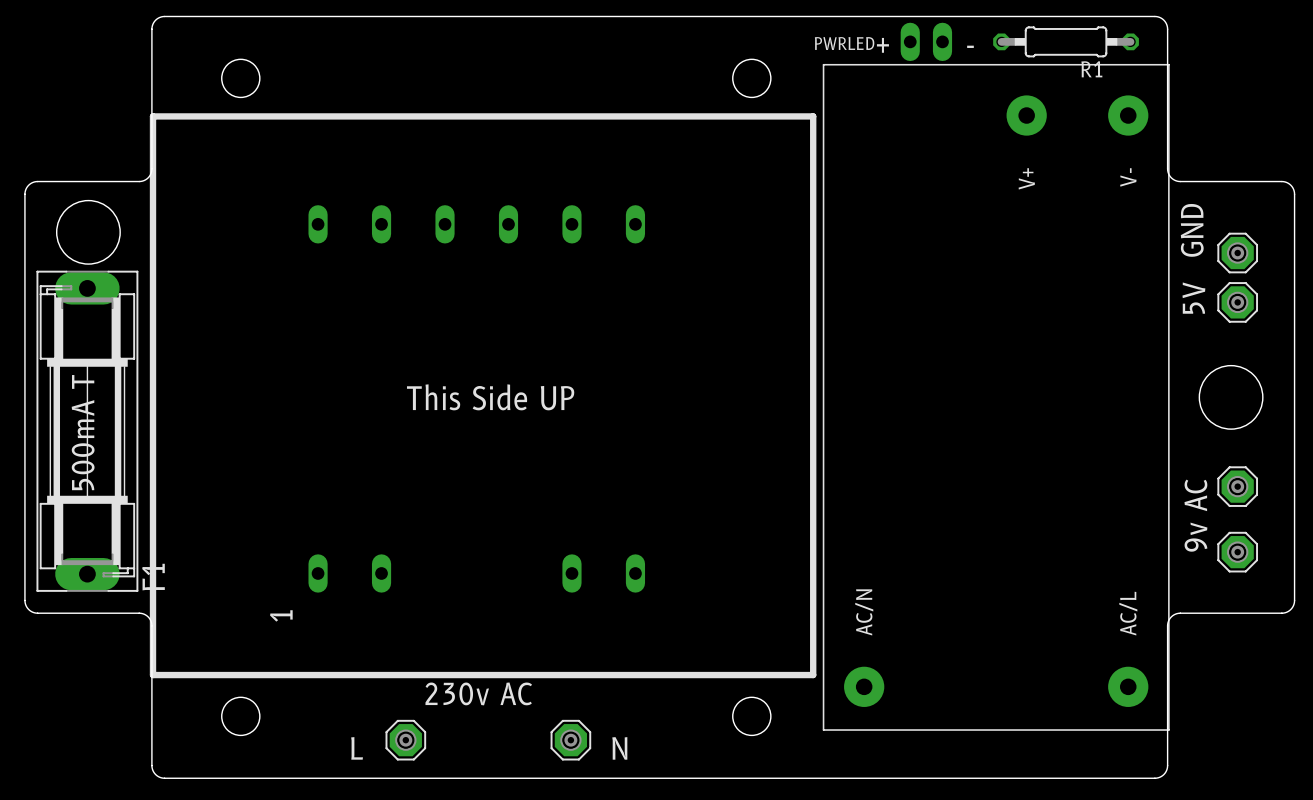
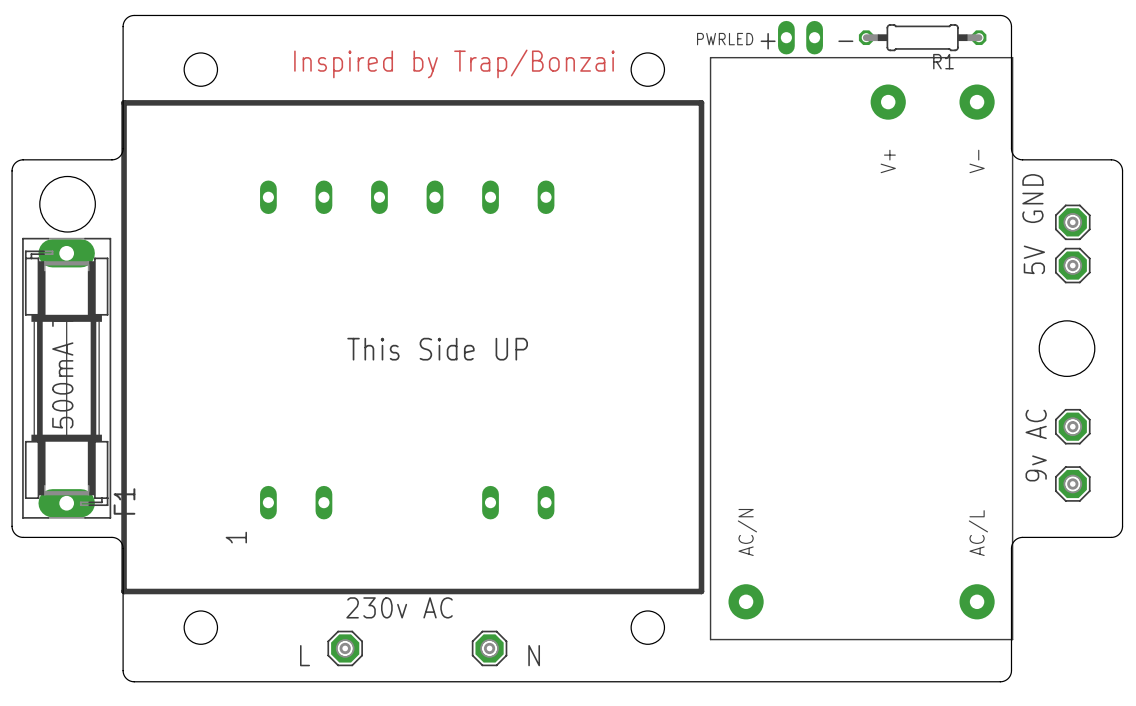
text: none -> Inspired by Trap/Bonzai (454, 63)

